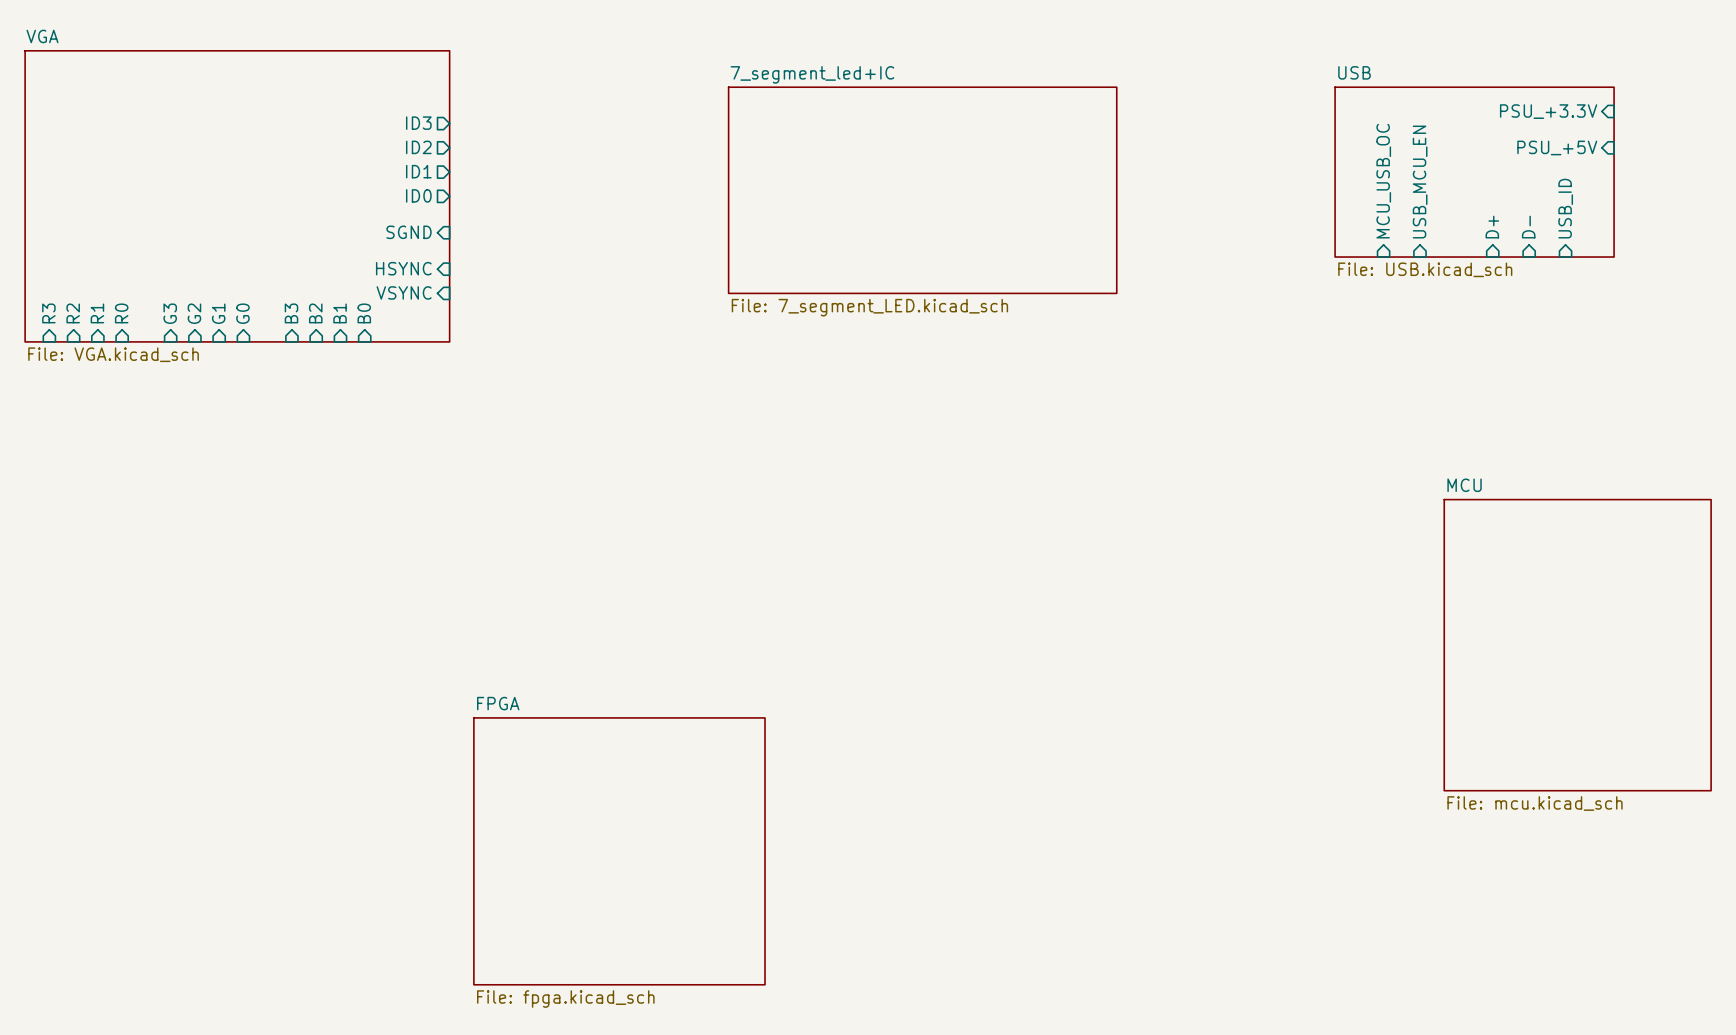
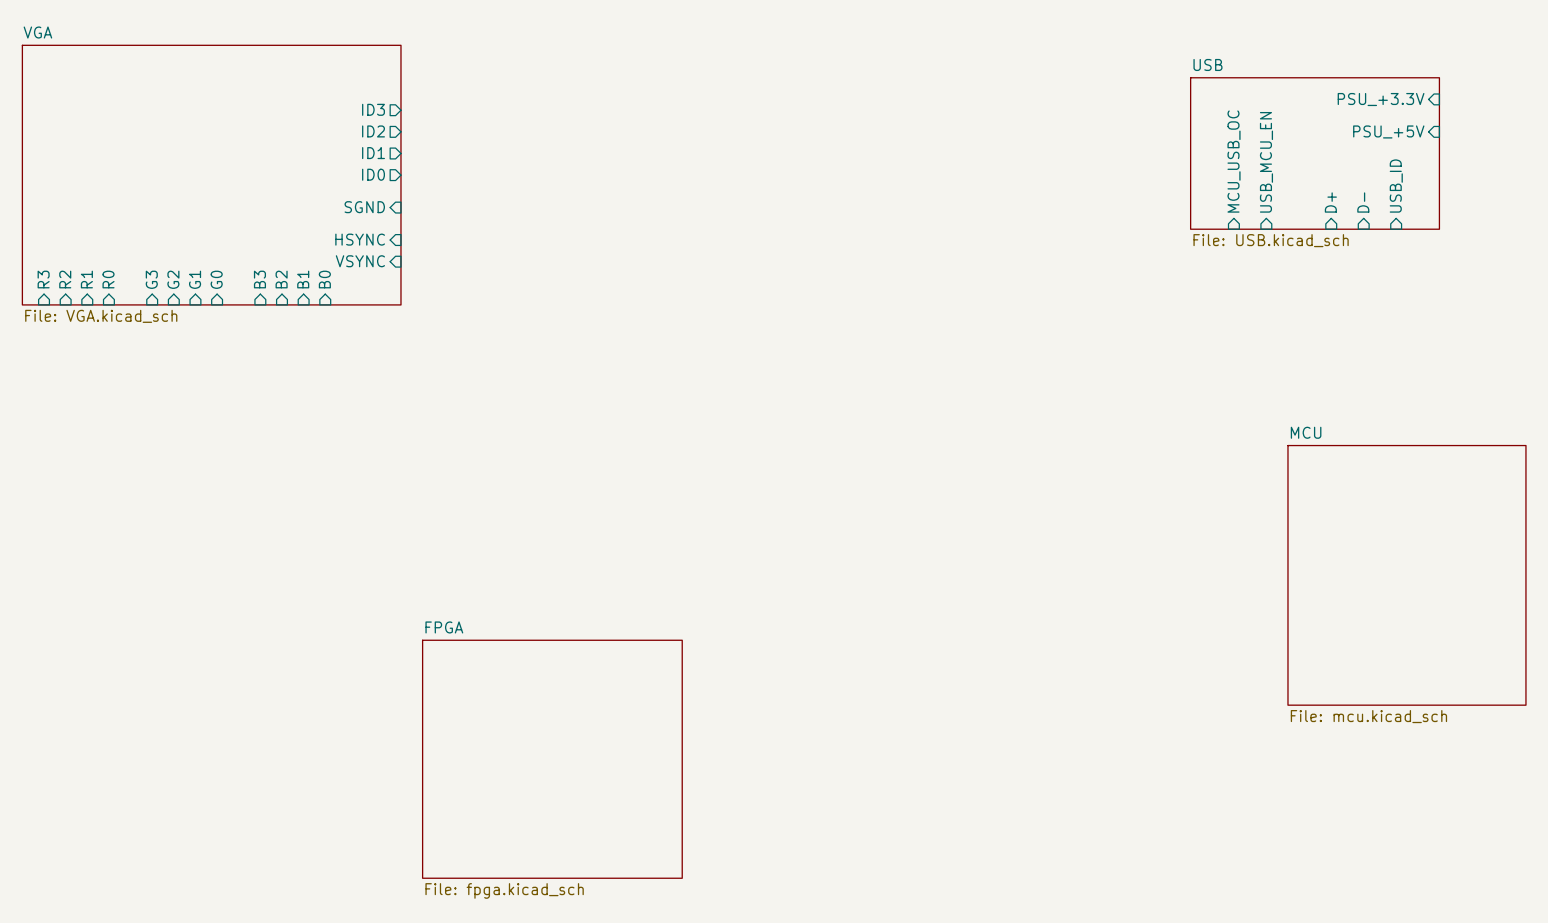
sheet 7_segment_led+IC: File: 7_segment_LED.kicad_sch (922, 190) -> none

